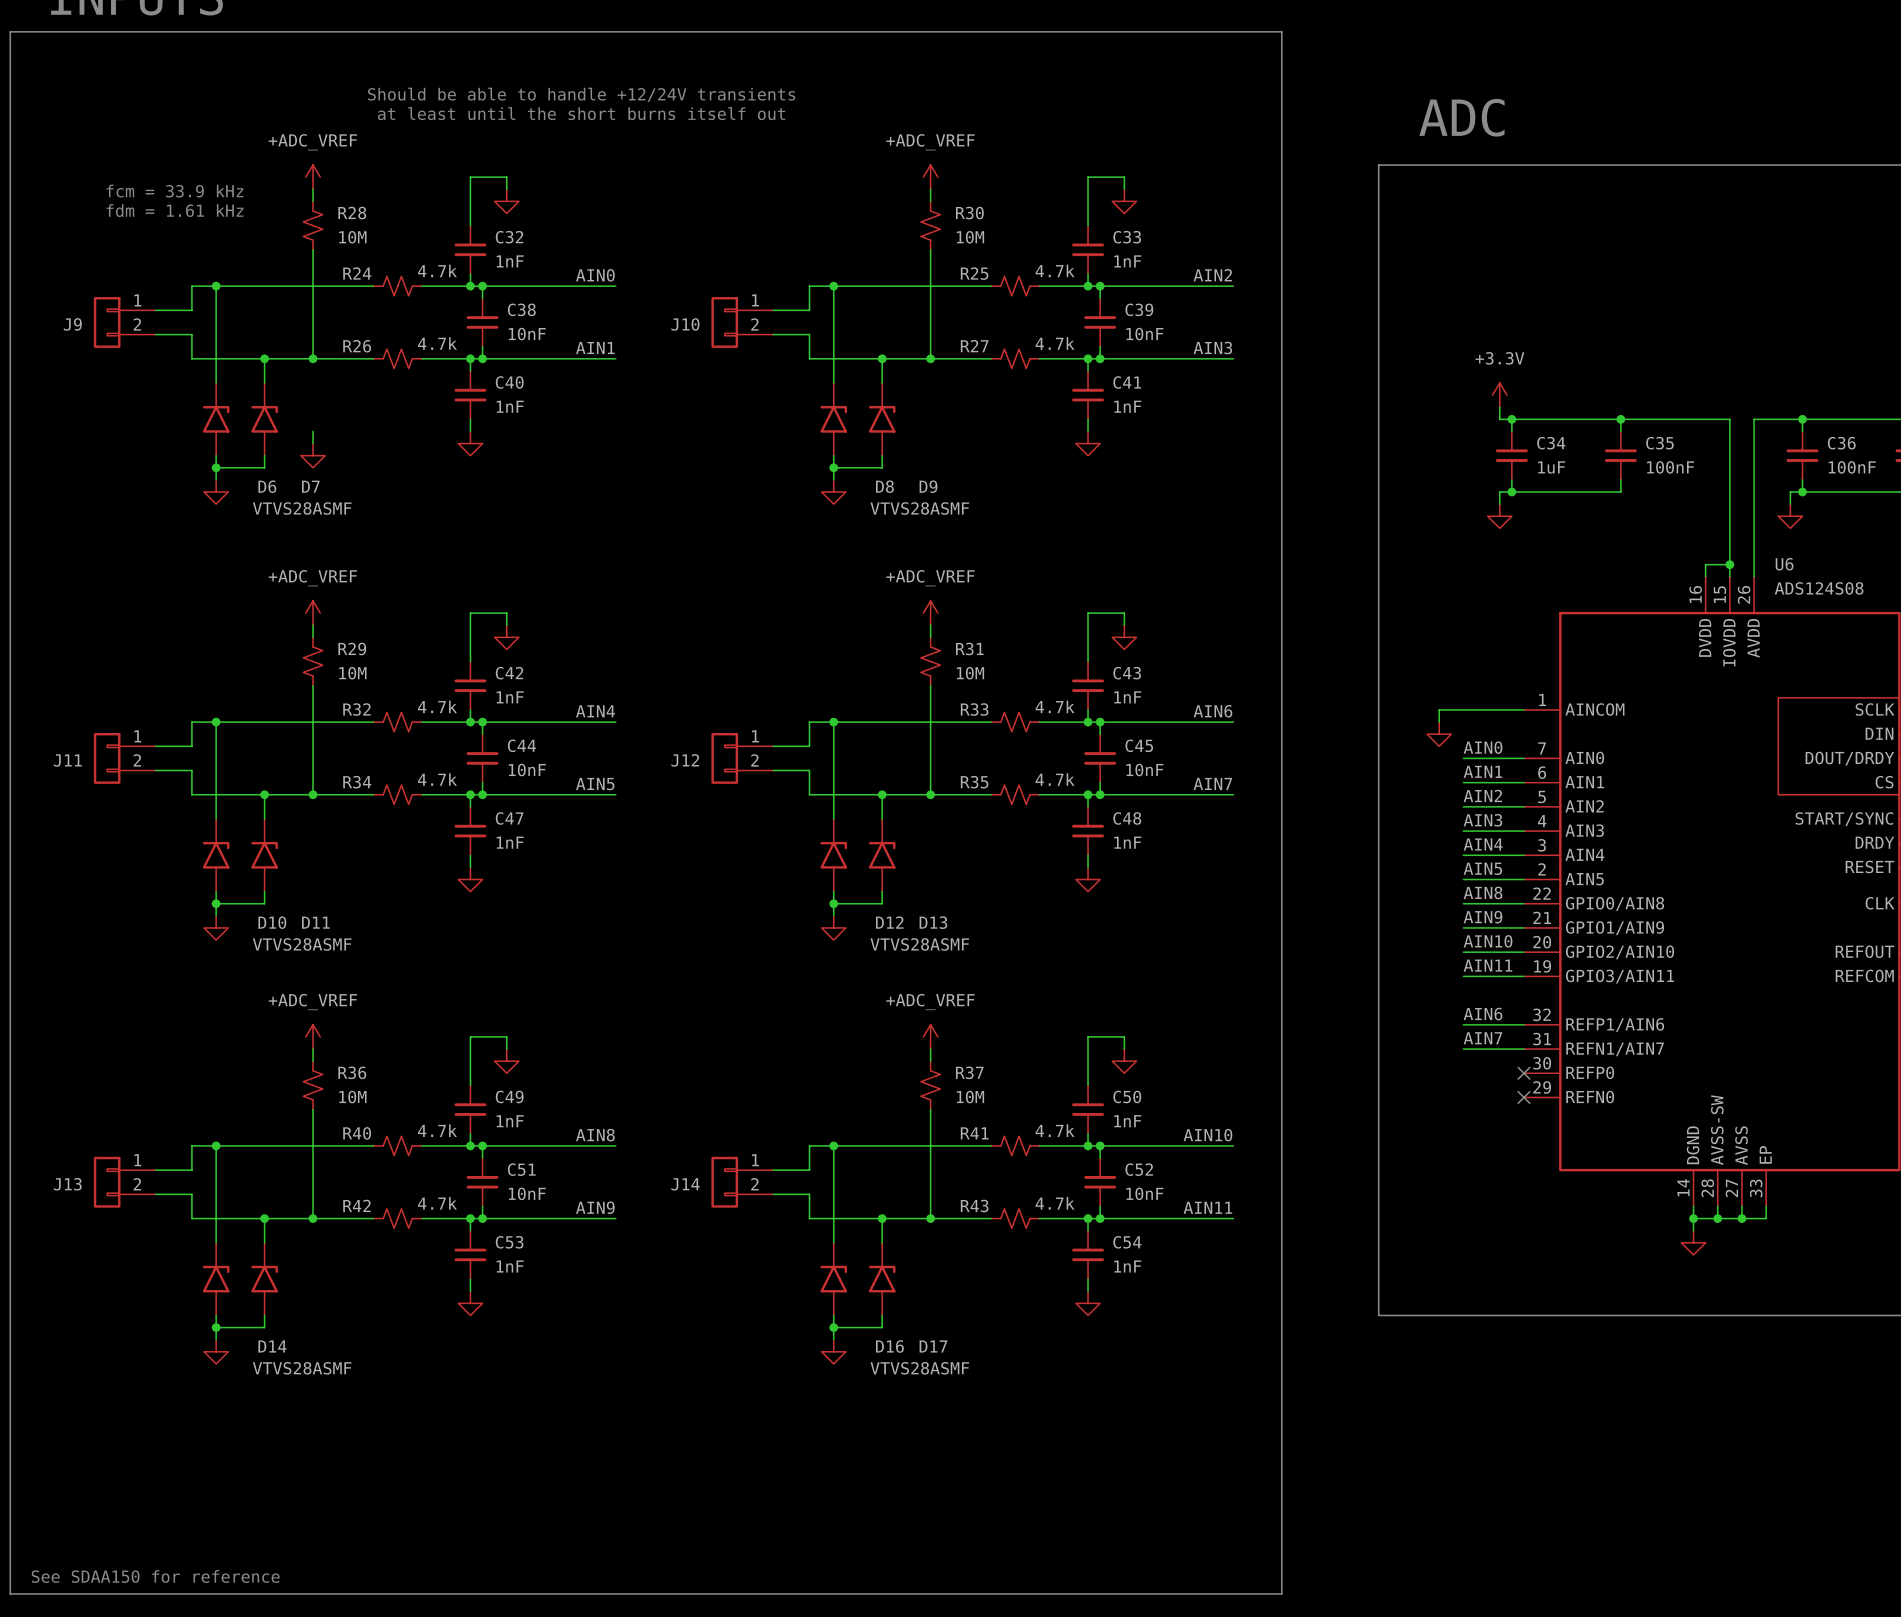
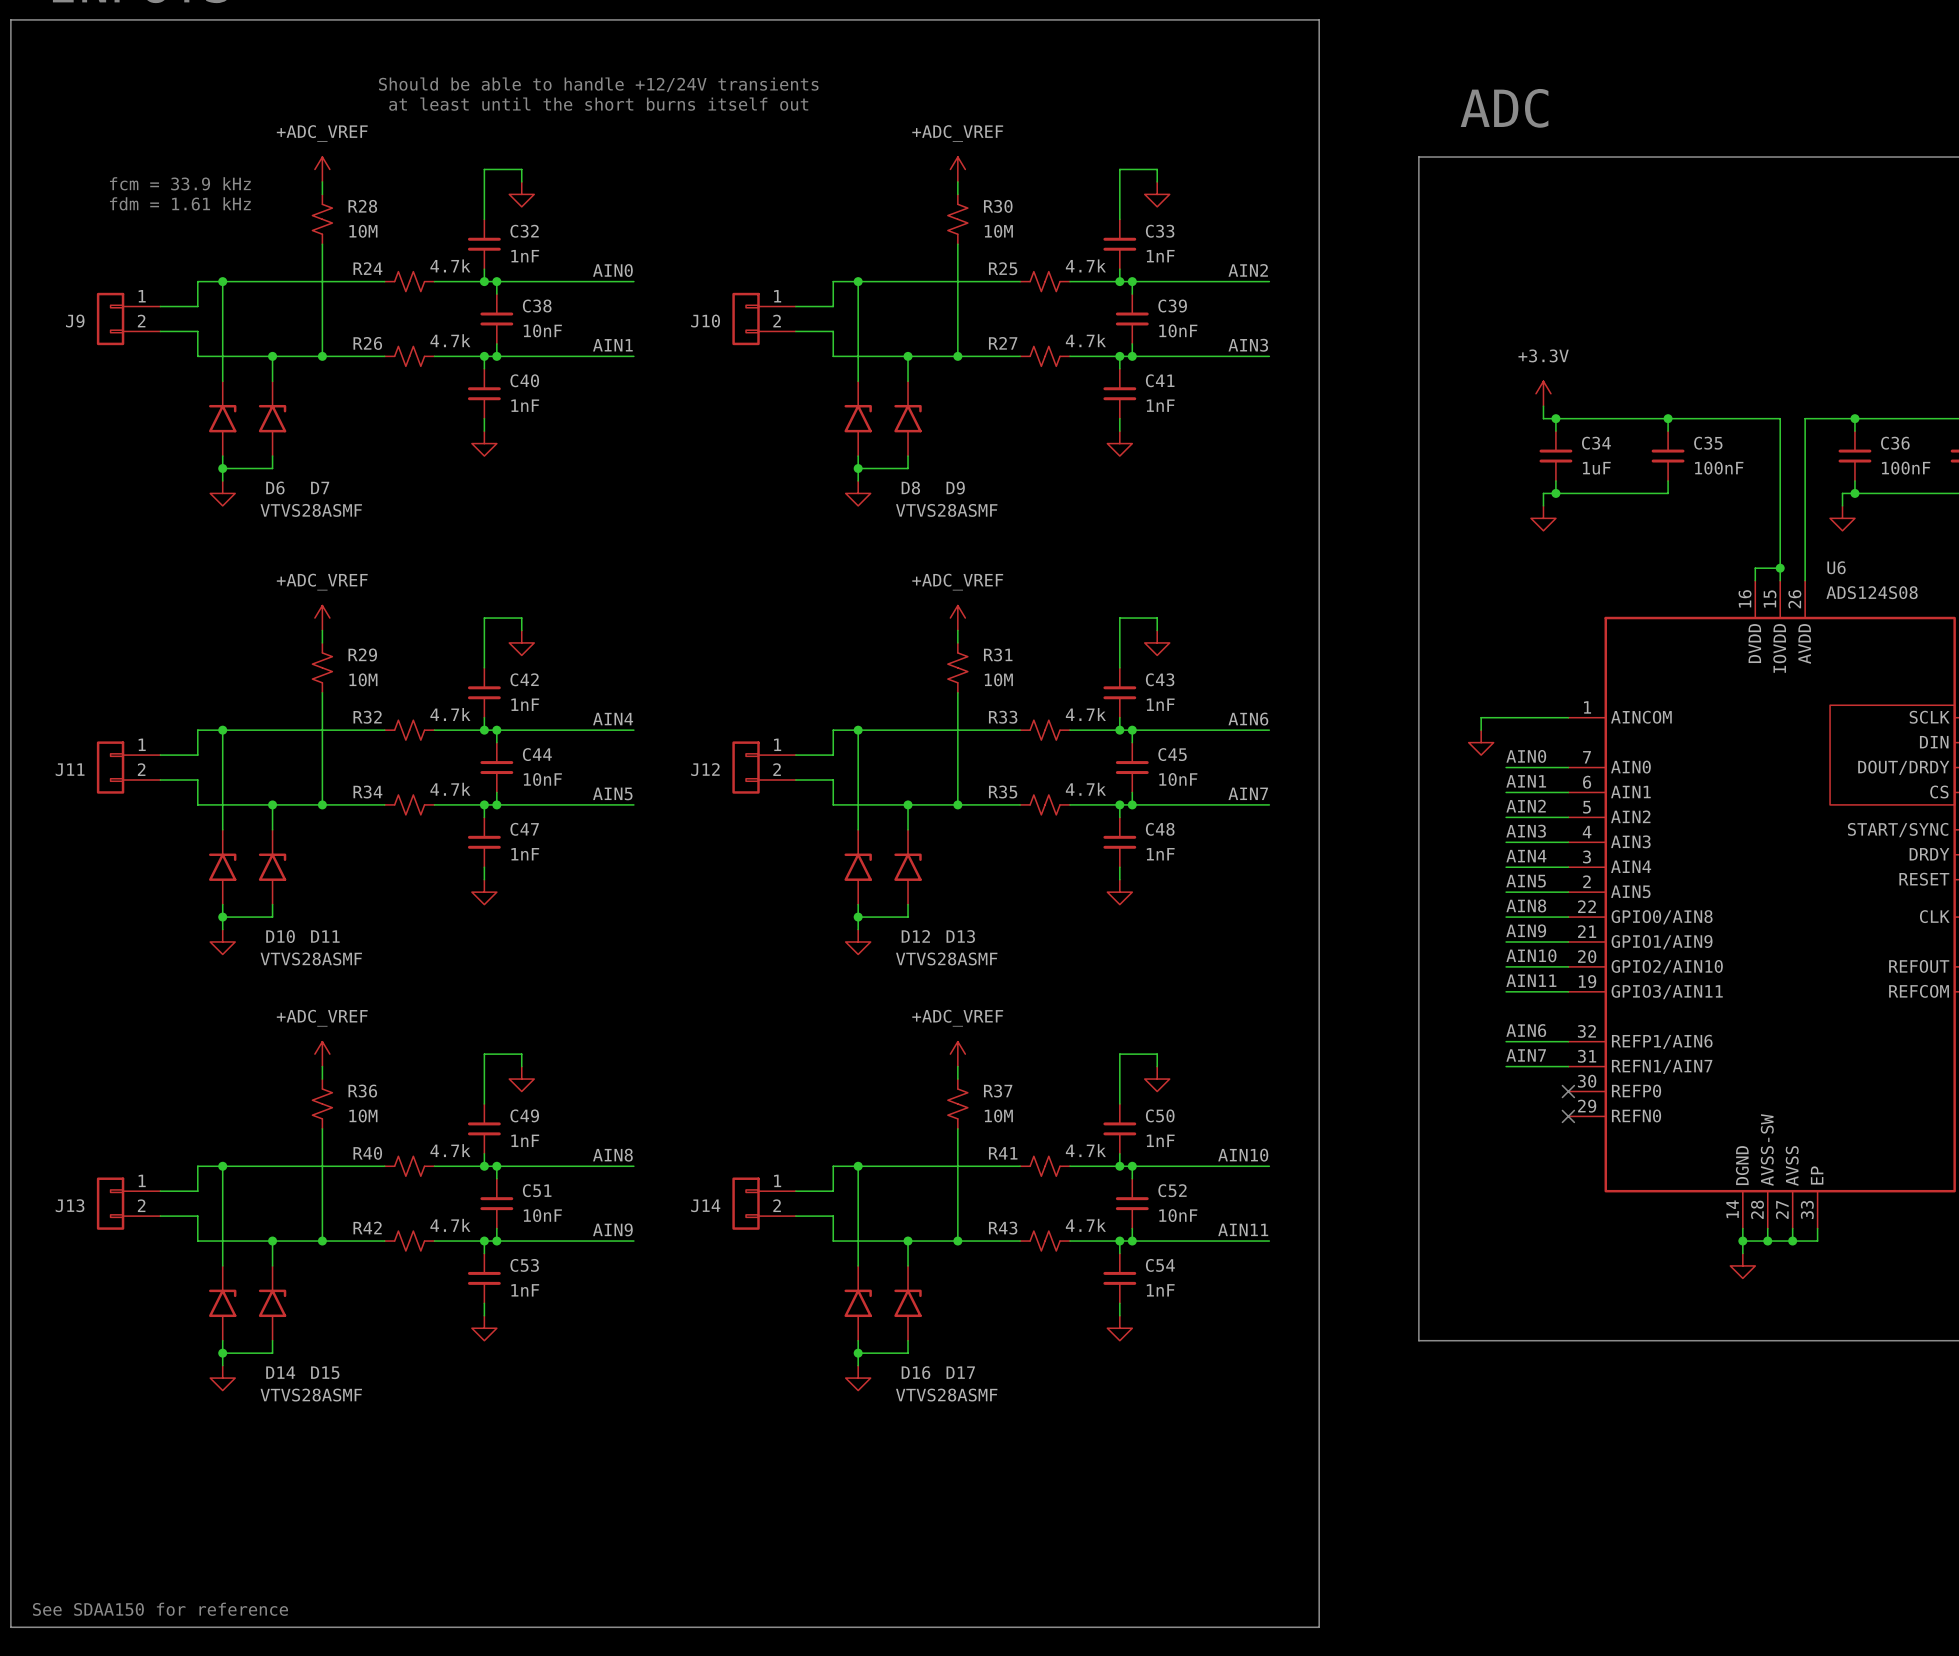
wire: (313, 431) (313, 443) -> none
power symbol: (313, 455) -> none
D15 name: none -> D15 (325, 1372)

